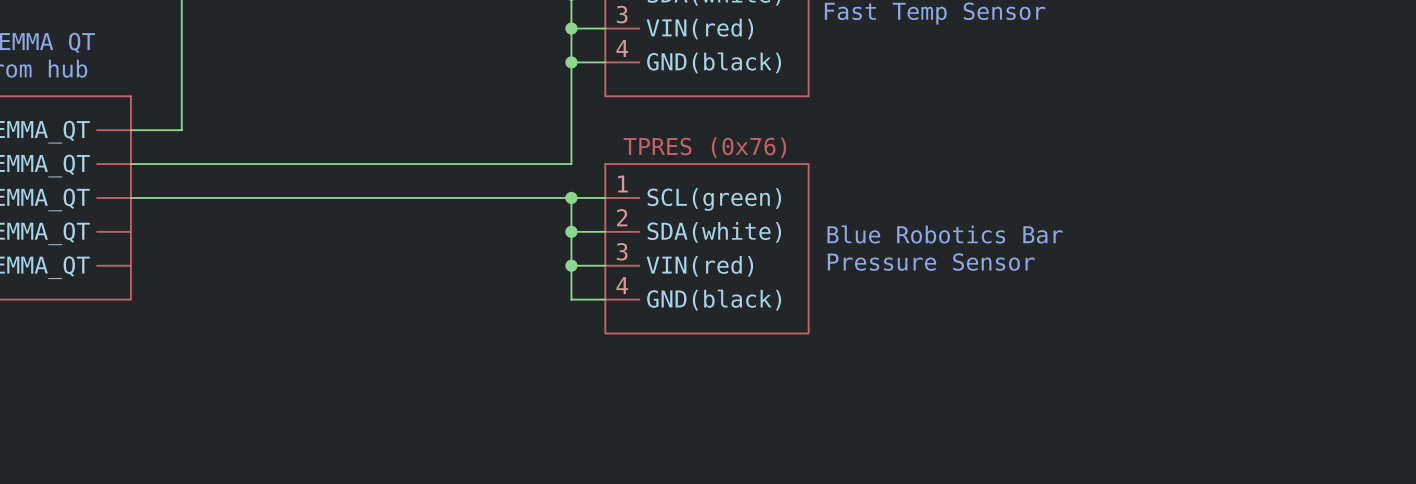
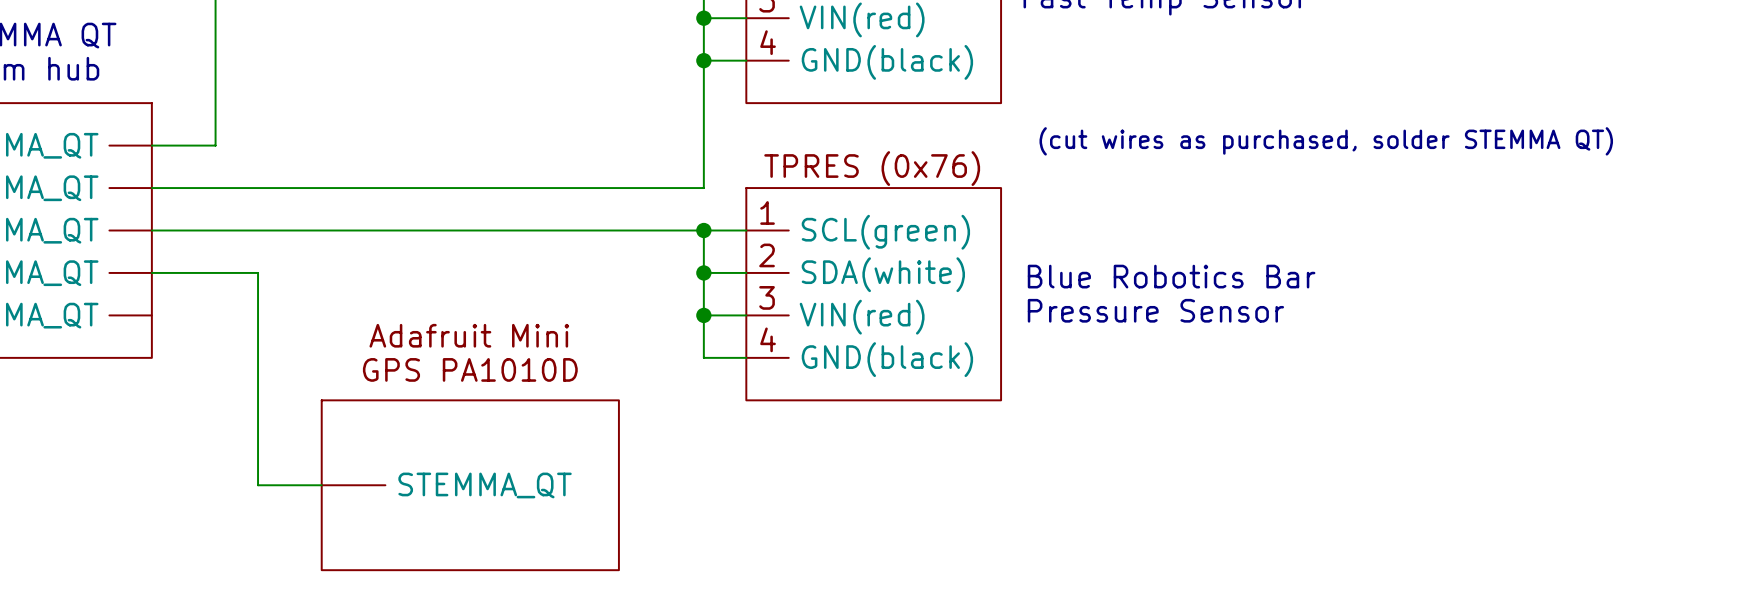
text: none -> (cut wires as purchased, solder STEMMA QT) (1326, 141)
wire: none -> (151, 272) (258, 272) (258, 485) (321, 485)
part: none -> (470, 485)

